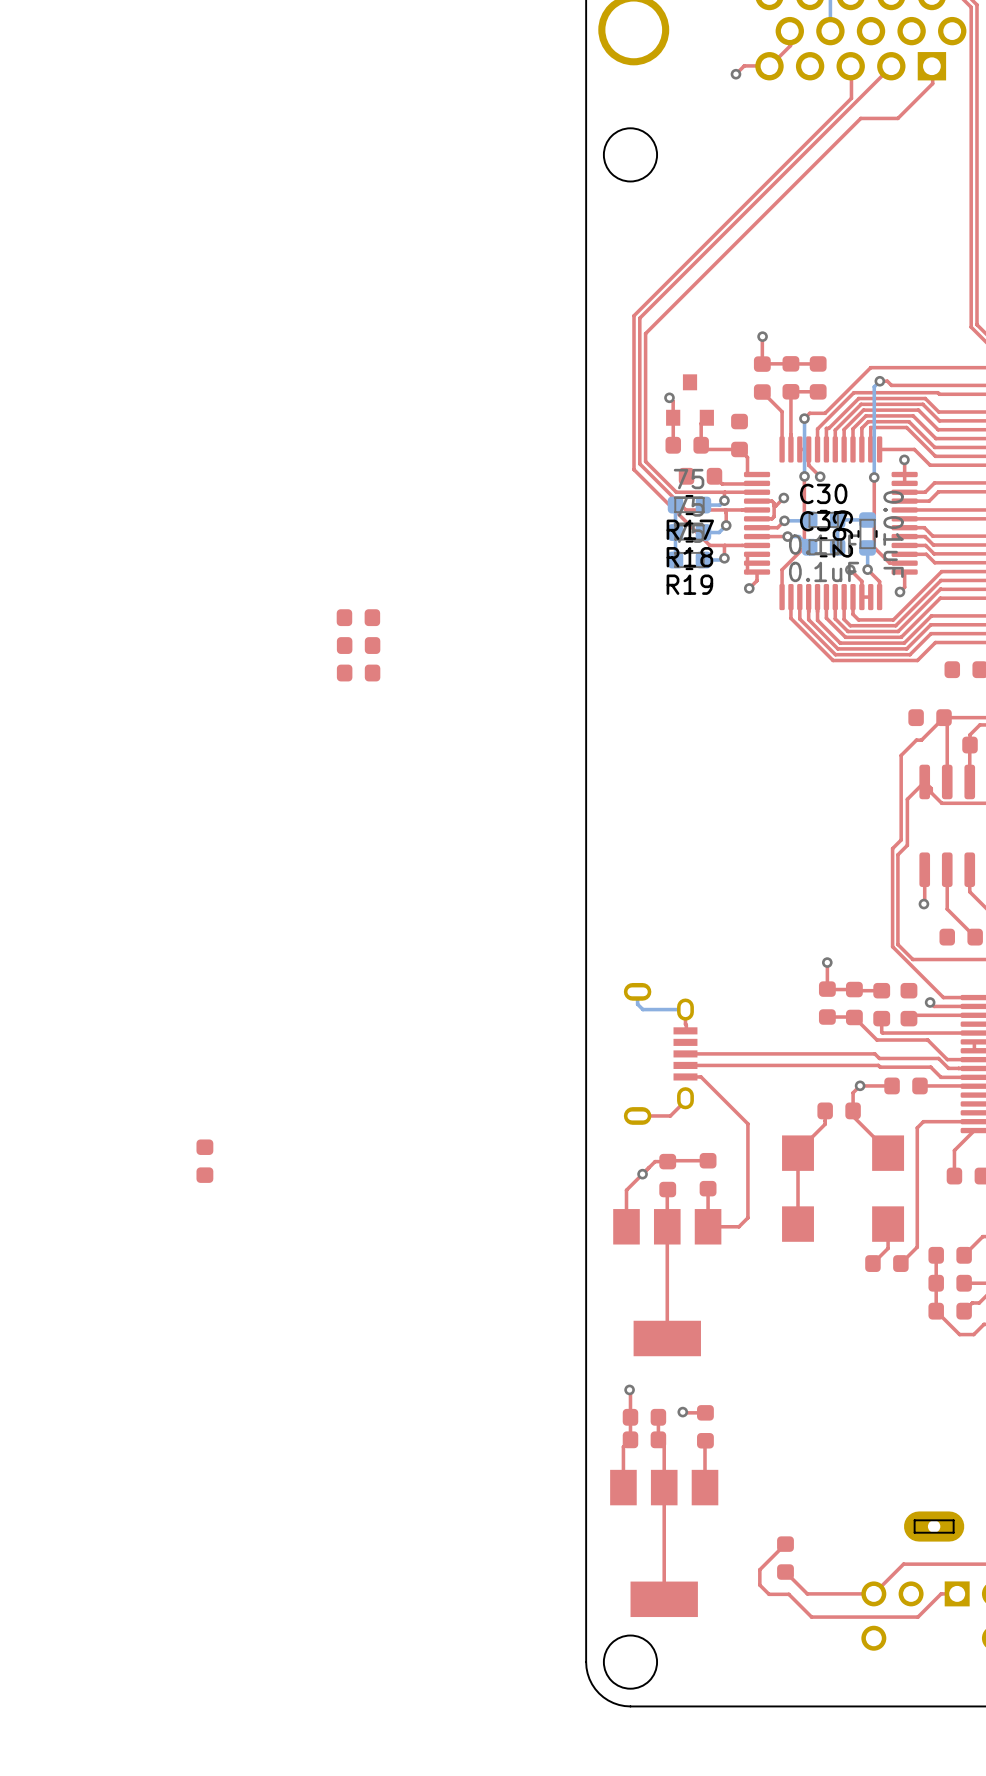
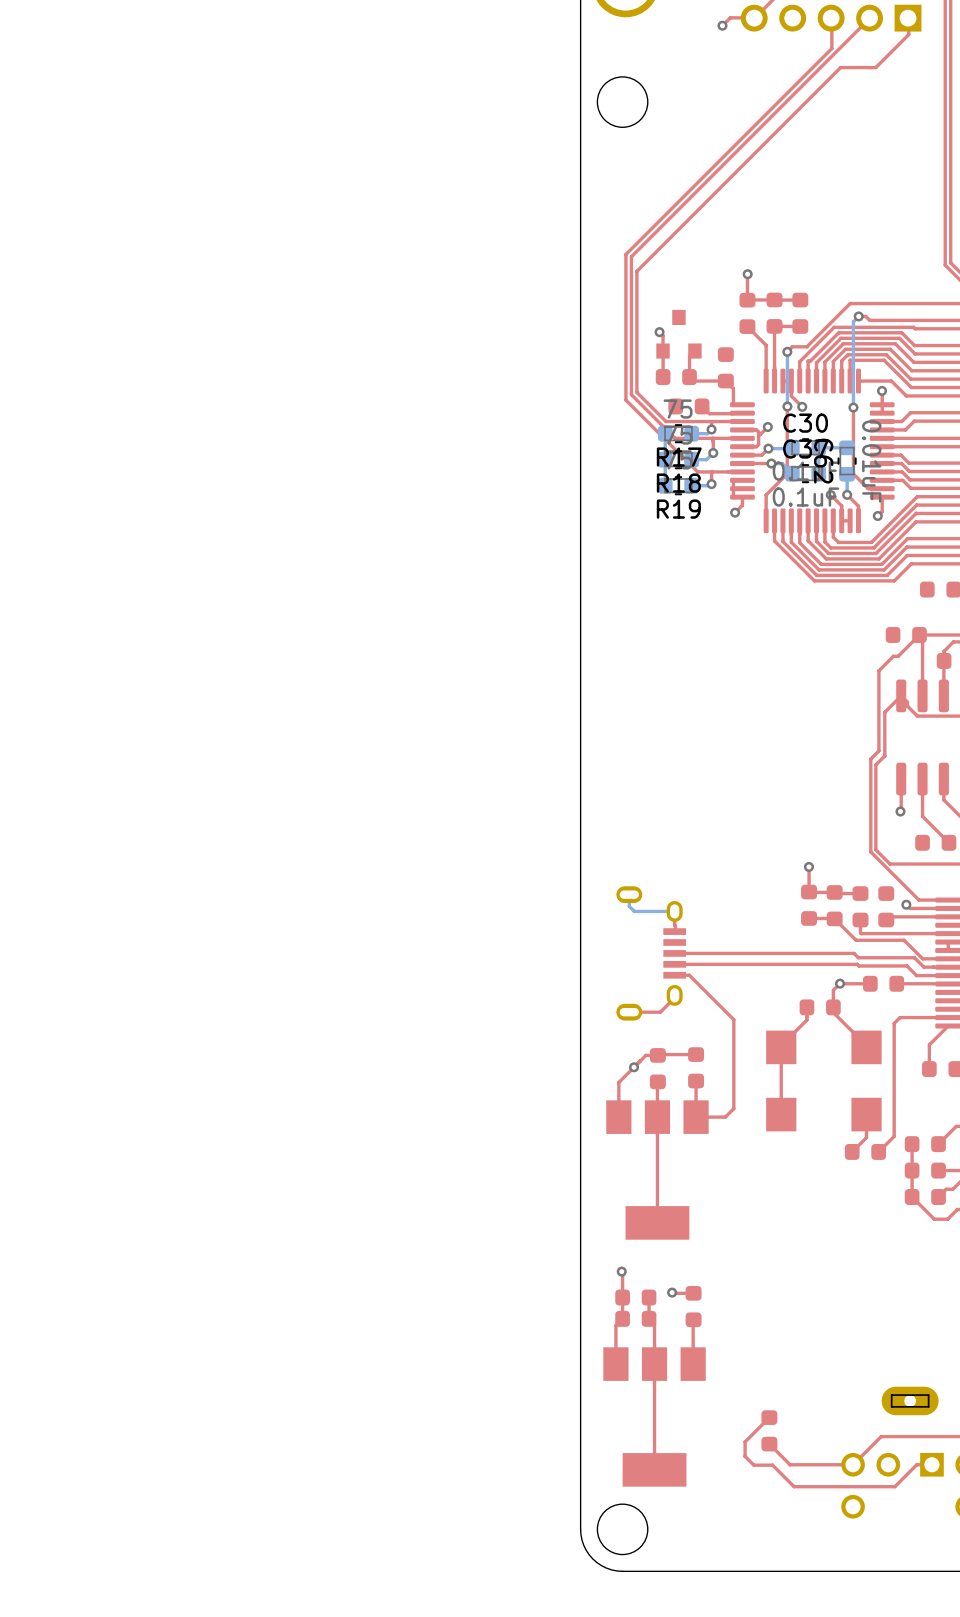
part: (358, 617) -> none
part: (358, 645) -> none
part: (358, 673) -> none
part: (204, 1161) -> none

